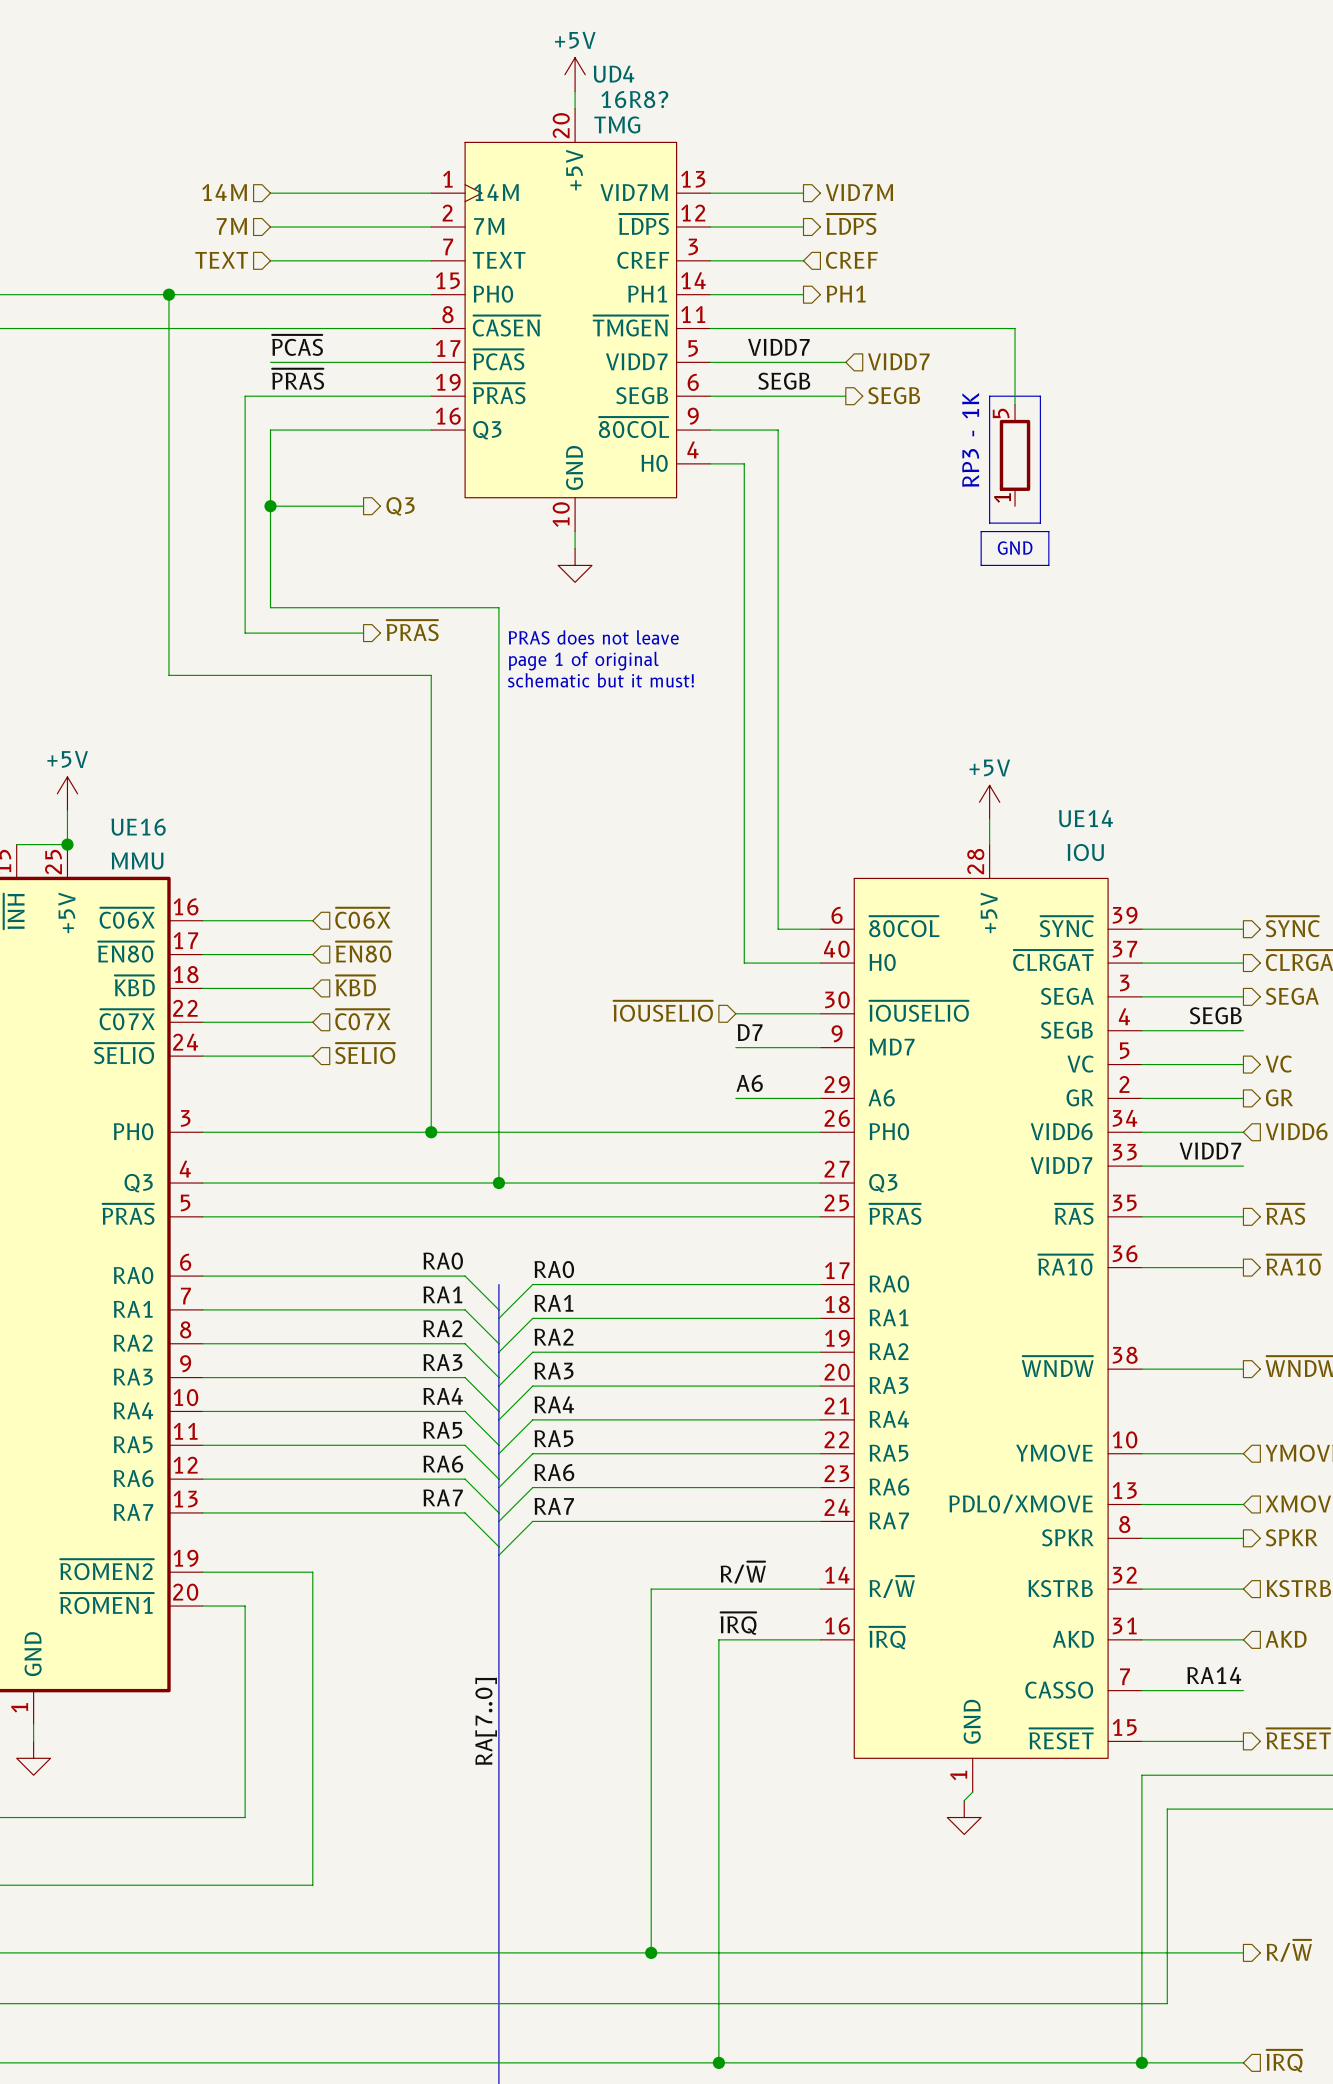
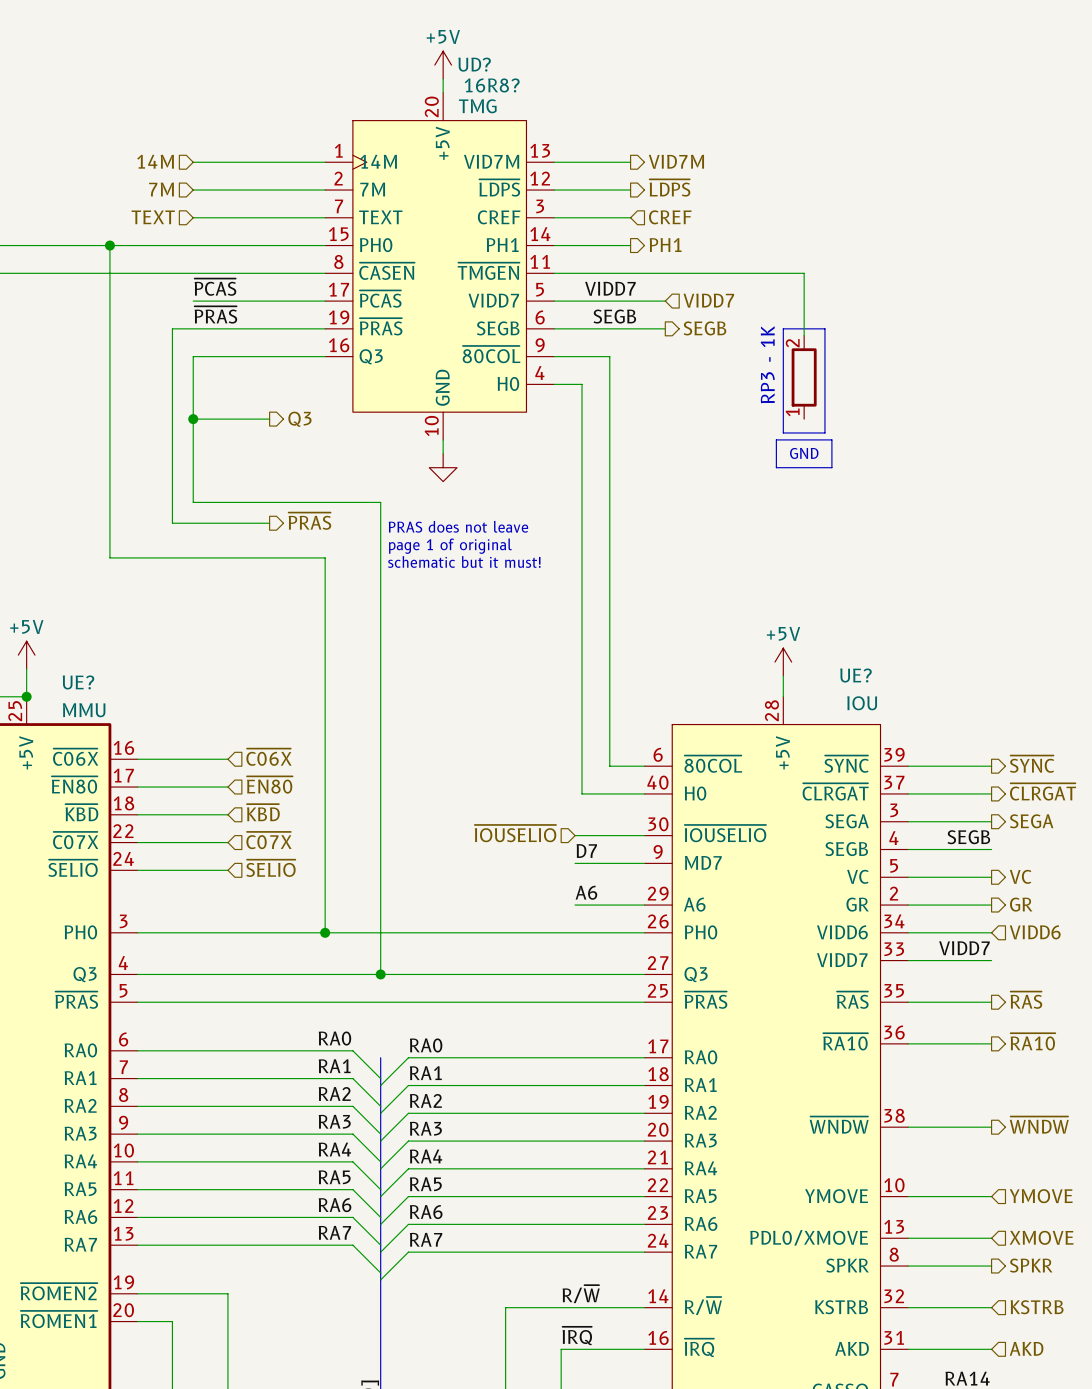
UD4 name: UD4 (613, 74) -> UD? (474, 64)
part symbol: [999, 404, 1031, 507] -> [791, 335, 817, 420]
UE14 name: UE14 (1085, 818) -> UE? (855, 675)
UE16 name: UE16 (138, 827) -> UE? (78, 682)

